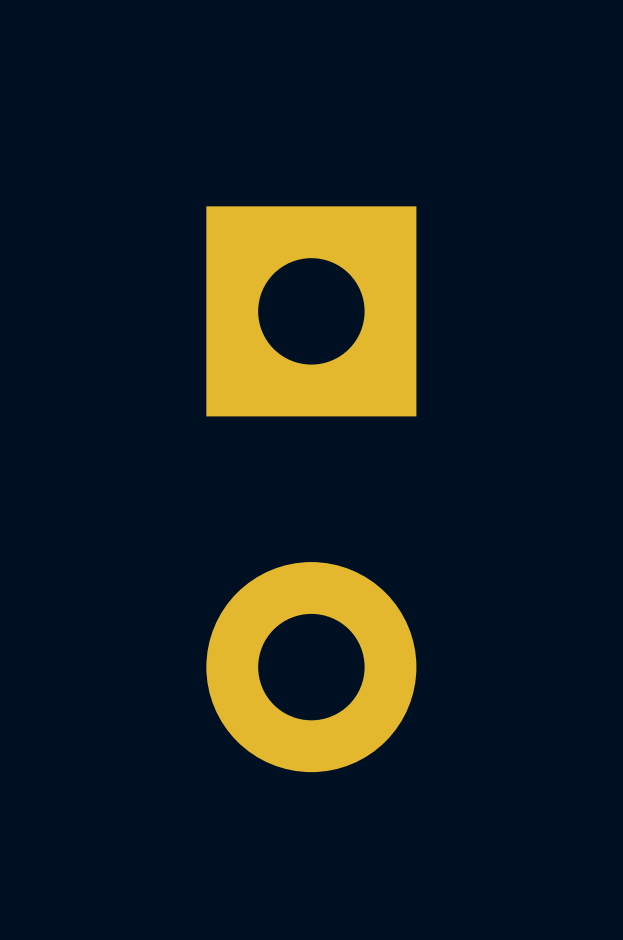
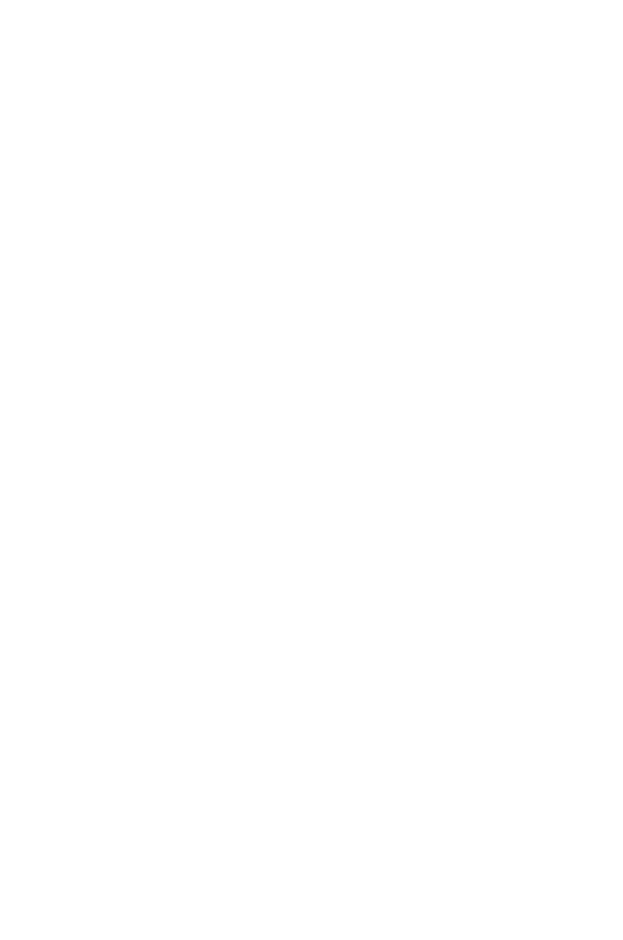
part: (311, 489) -> none

